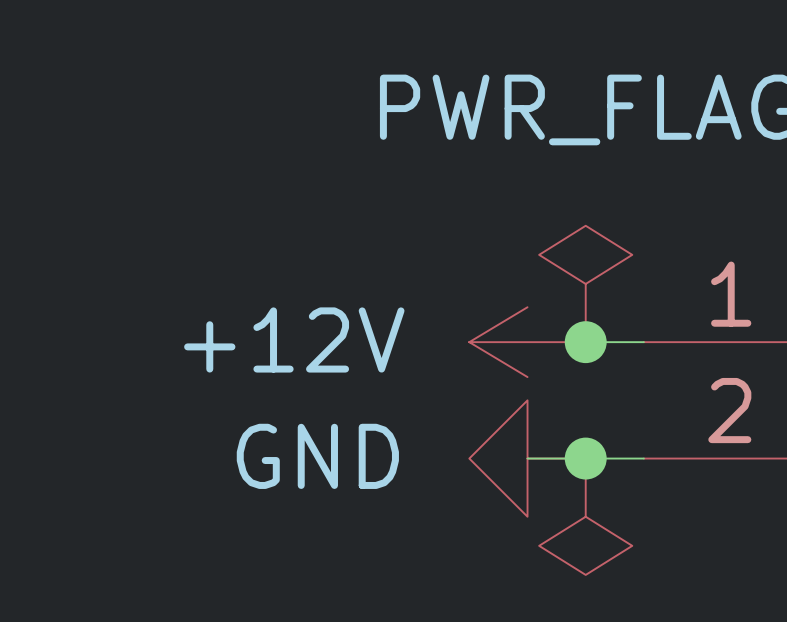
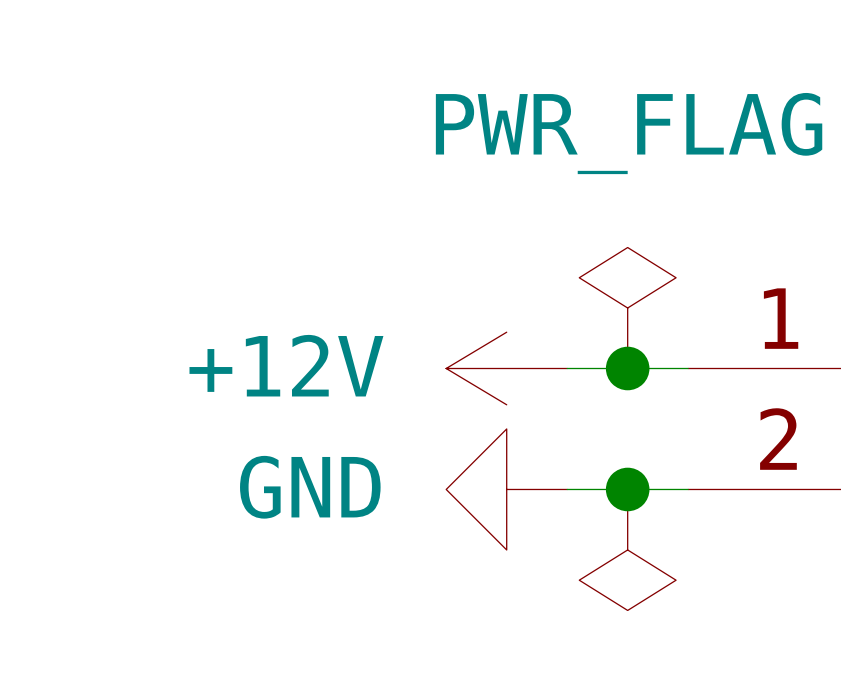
power symbol position: +12V (527, 342) -> +12V (506, 368)
power symbol position: GND (527, 458) -> GND (506, 489)

